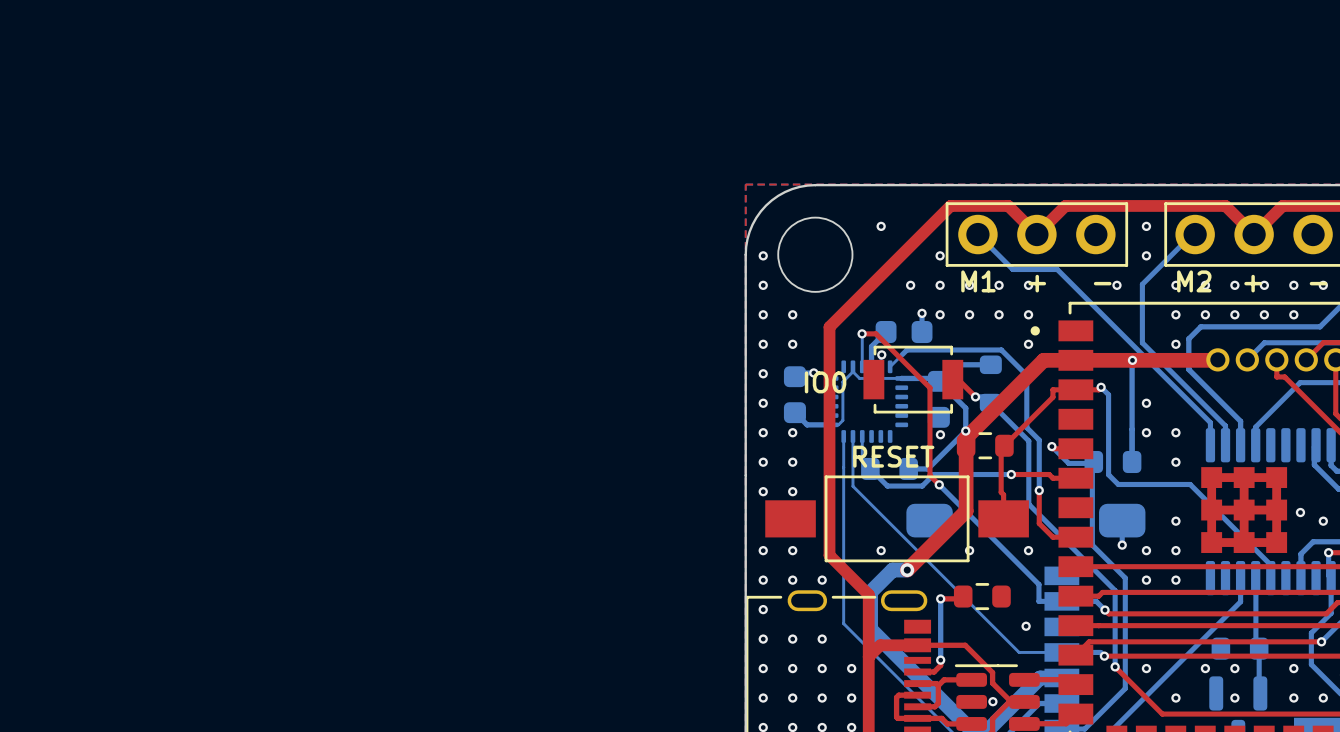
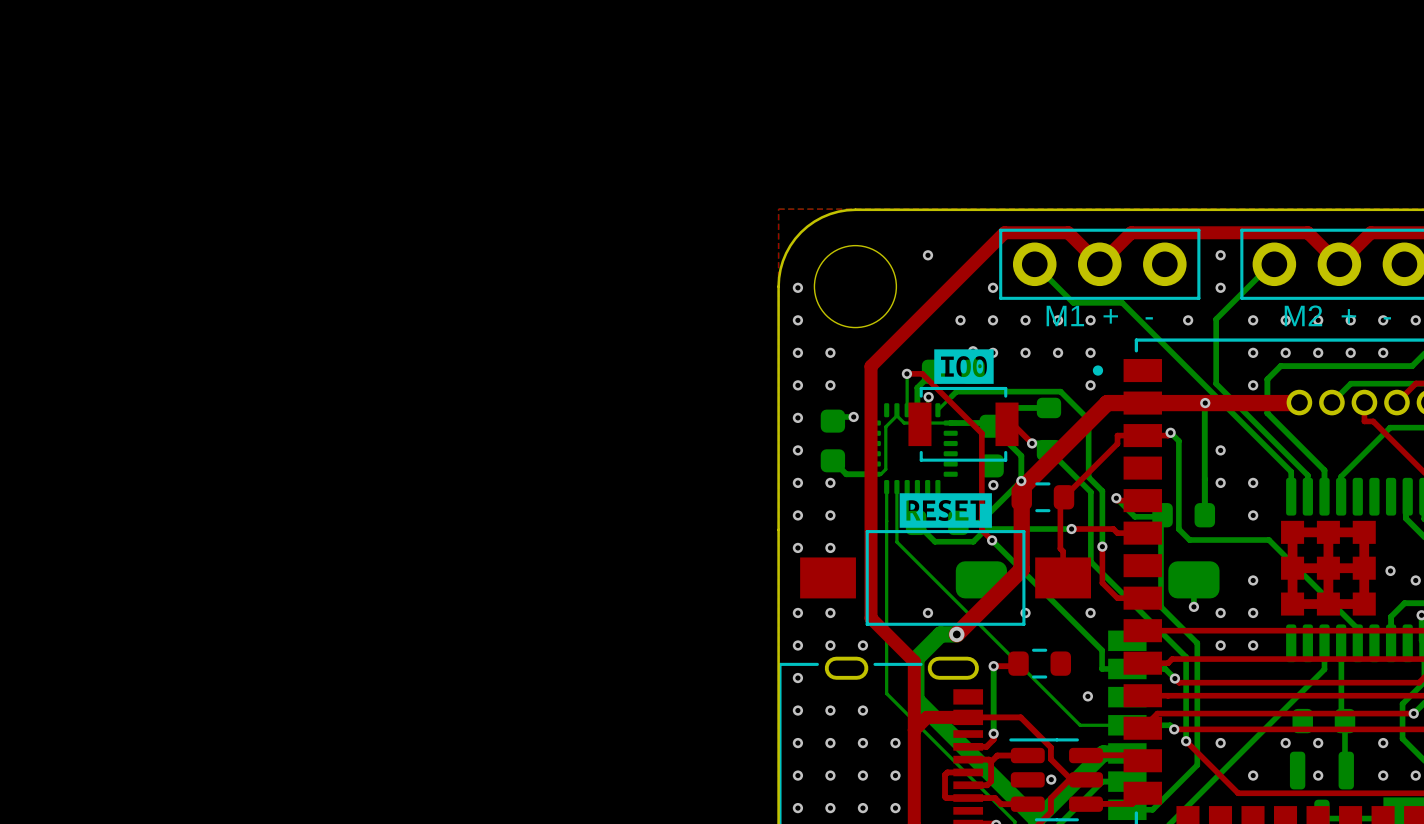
drawing: none -> [934, 349, 994, 384]
text: IO0 (825, 382) -> none
drawing: none -> [899, 493, 992, 528]
text: RESET (893, 456) -> none

